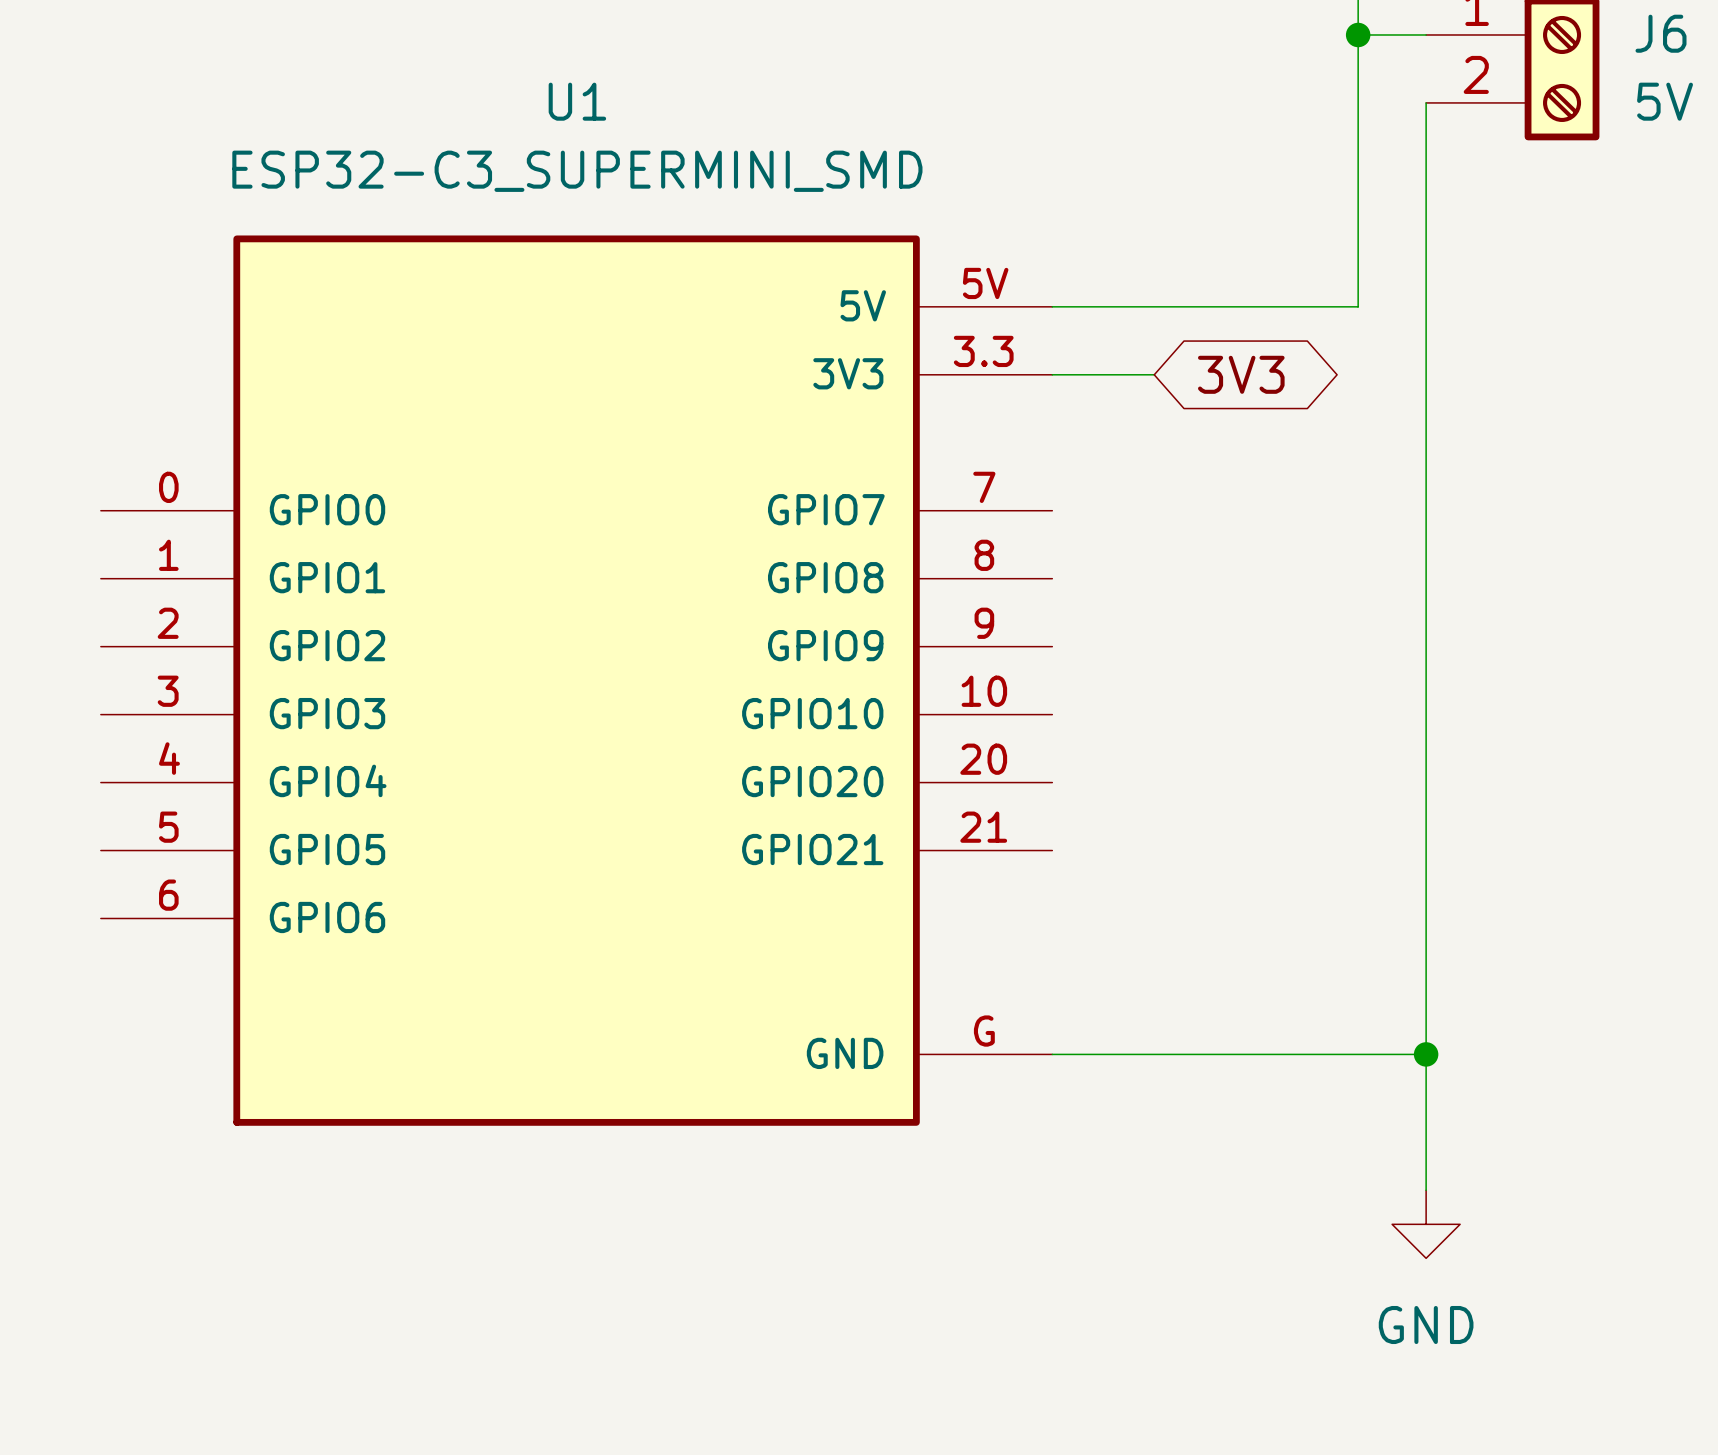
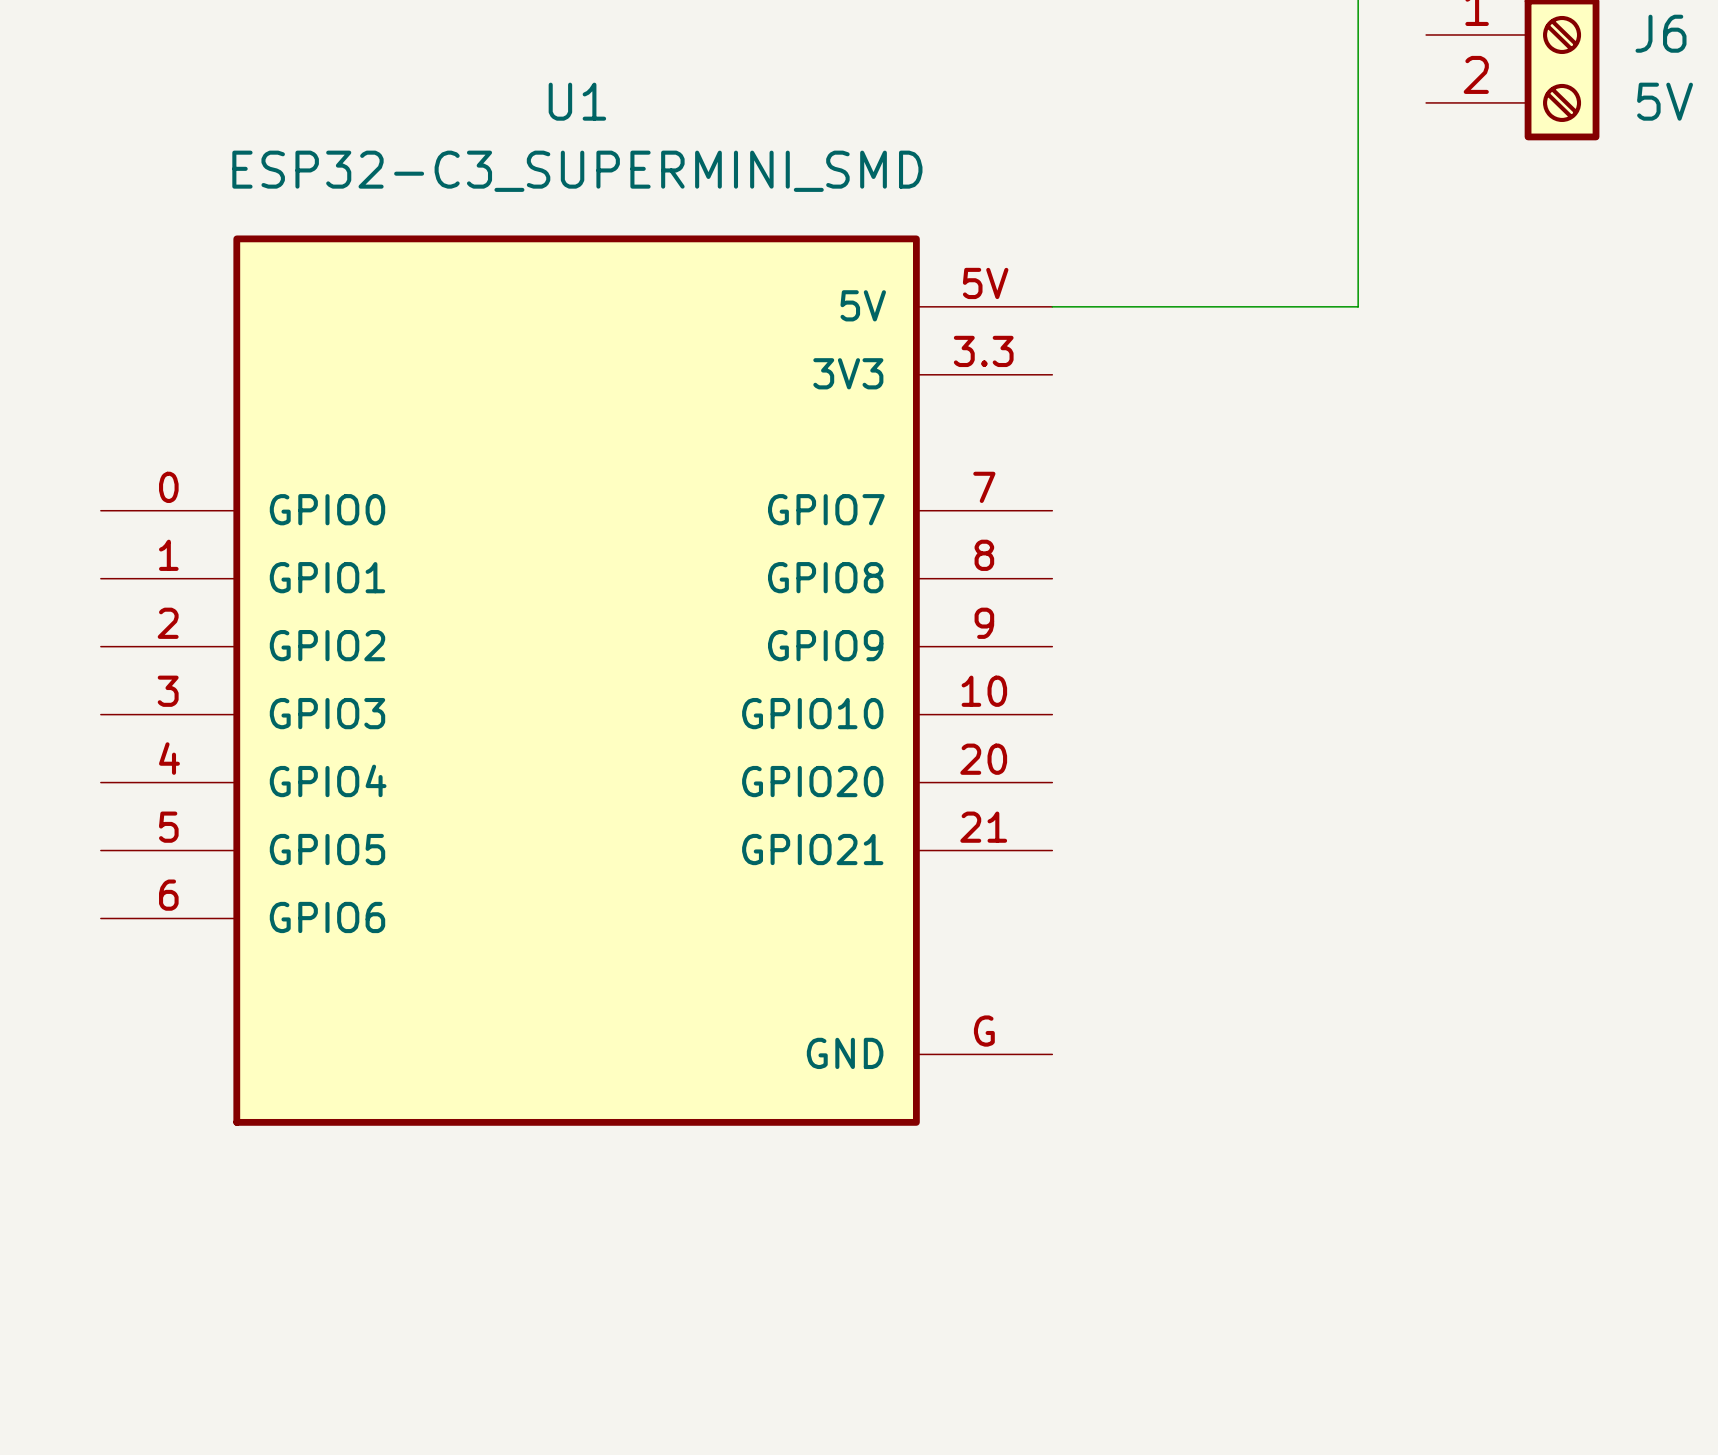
wire: (1358, 34) (1426, 34) -> none
junction: (1358, 34) -> none
wire: (1426, 102) (1426, 1190) -> none
wire: (1052, 374) (1154, 374) -> none
global label: 3V3 (1241, 374) -> none
wire: (1052, 1054) (1426, 1054) -> none
junction: (1426, 1054) -> none
power symbol: GND (1426, 1224) -> none

